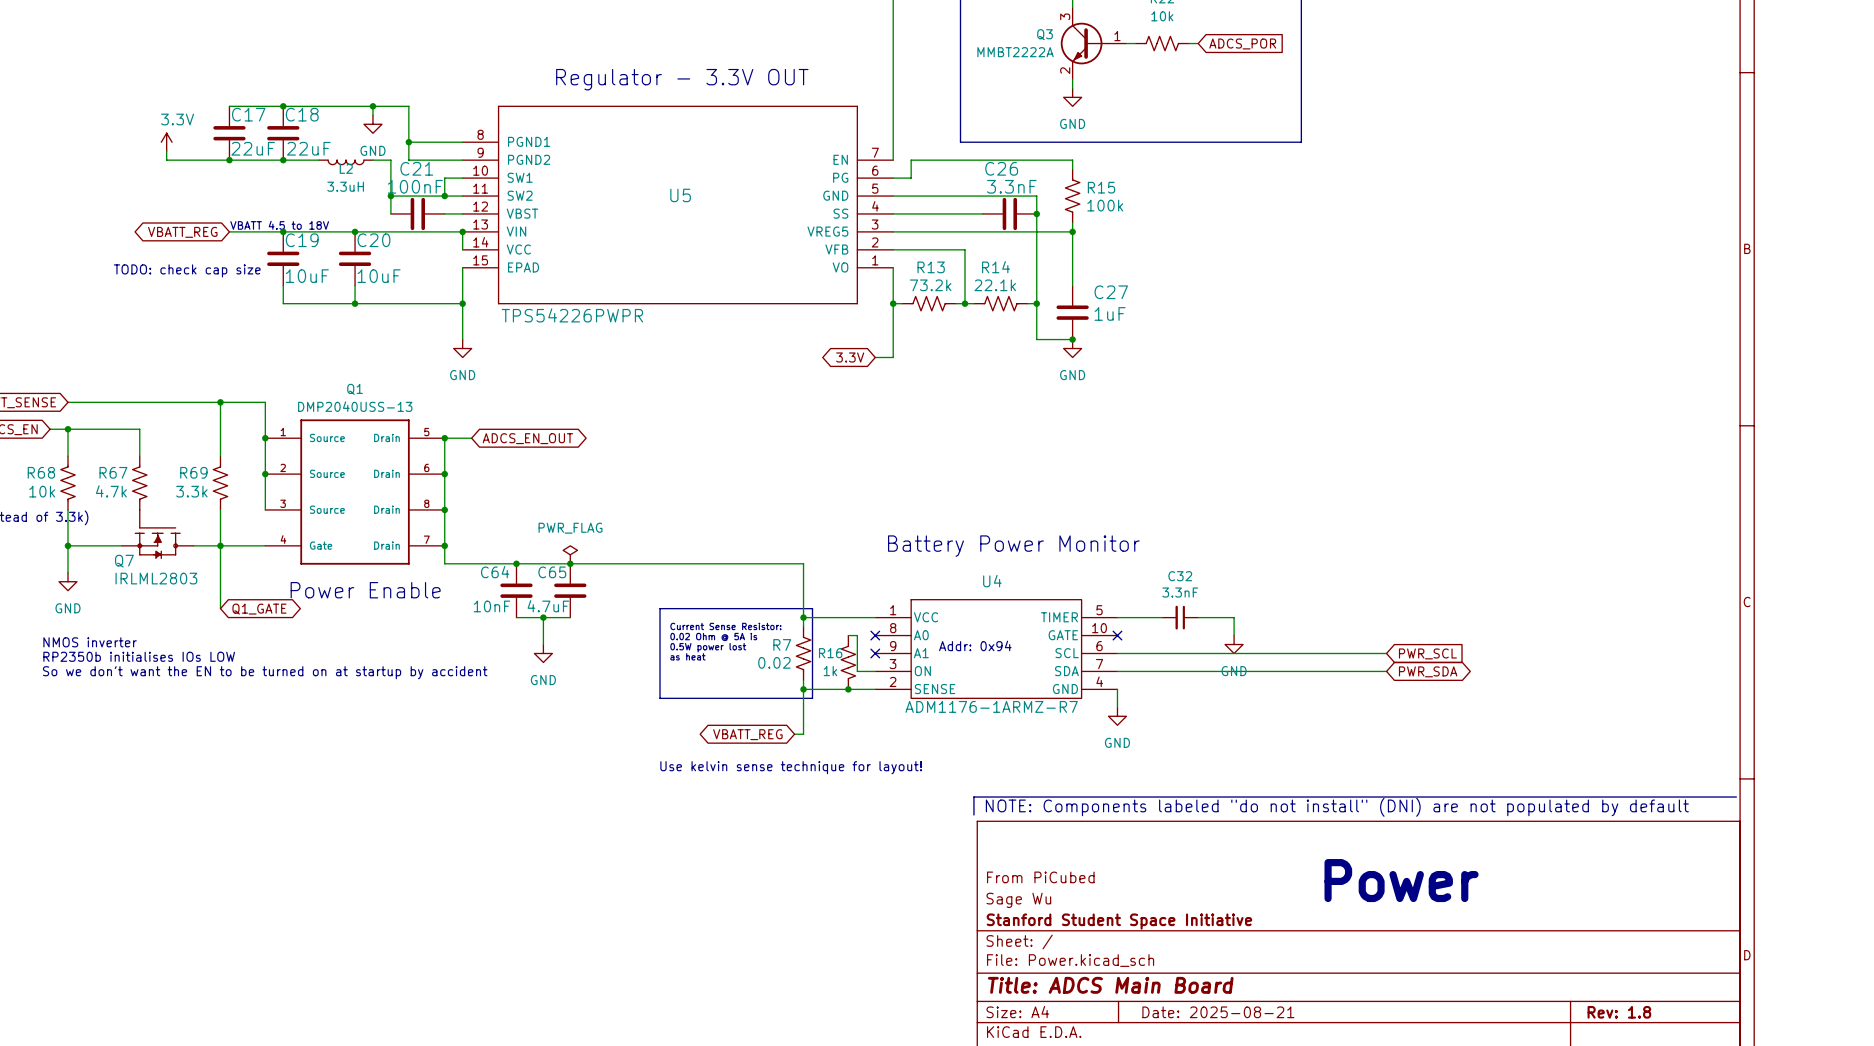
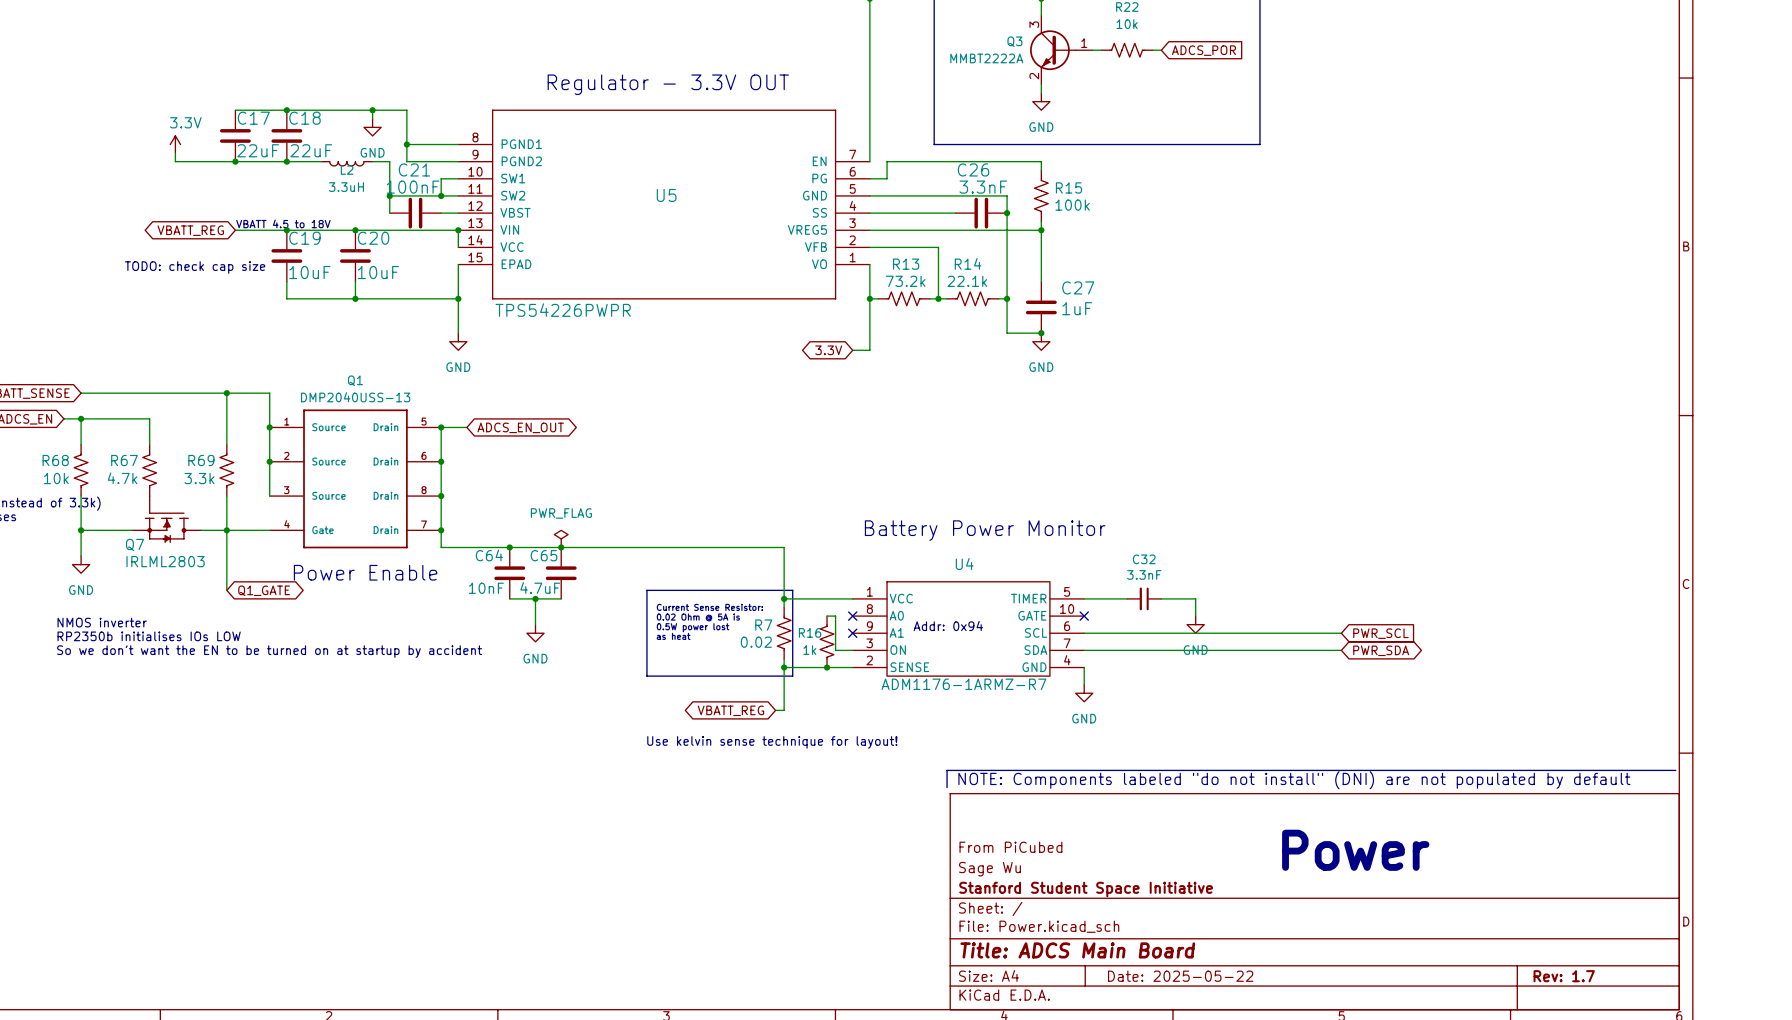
title block: Date: 2025-08-21 (1218, 1012) -> Date: 2025-05-22 (1180, 976)
title block: Rev: 1.8 (1619, 1012) -> Rev: 1.7 (1564, 976)

